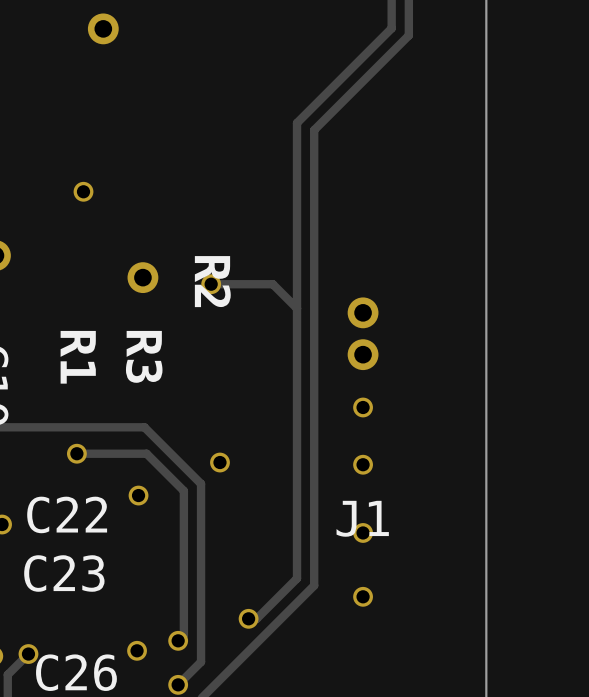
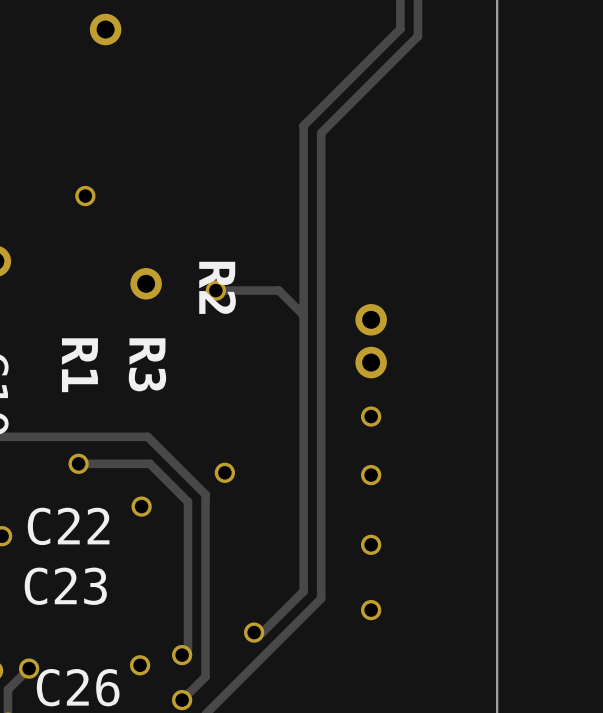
J1: (362, 518) -> none

